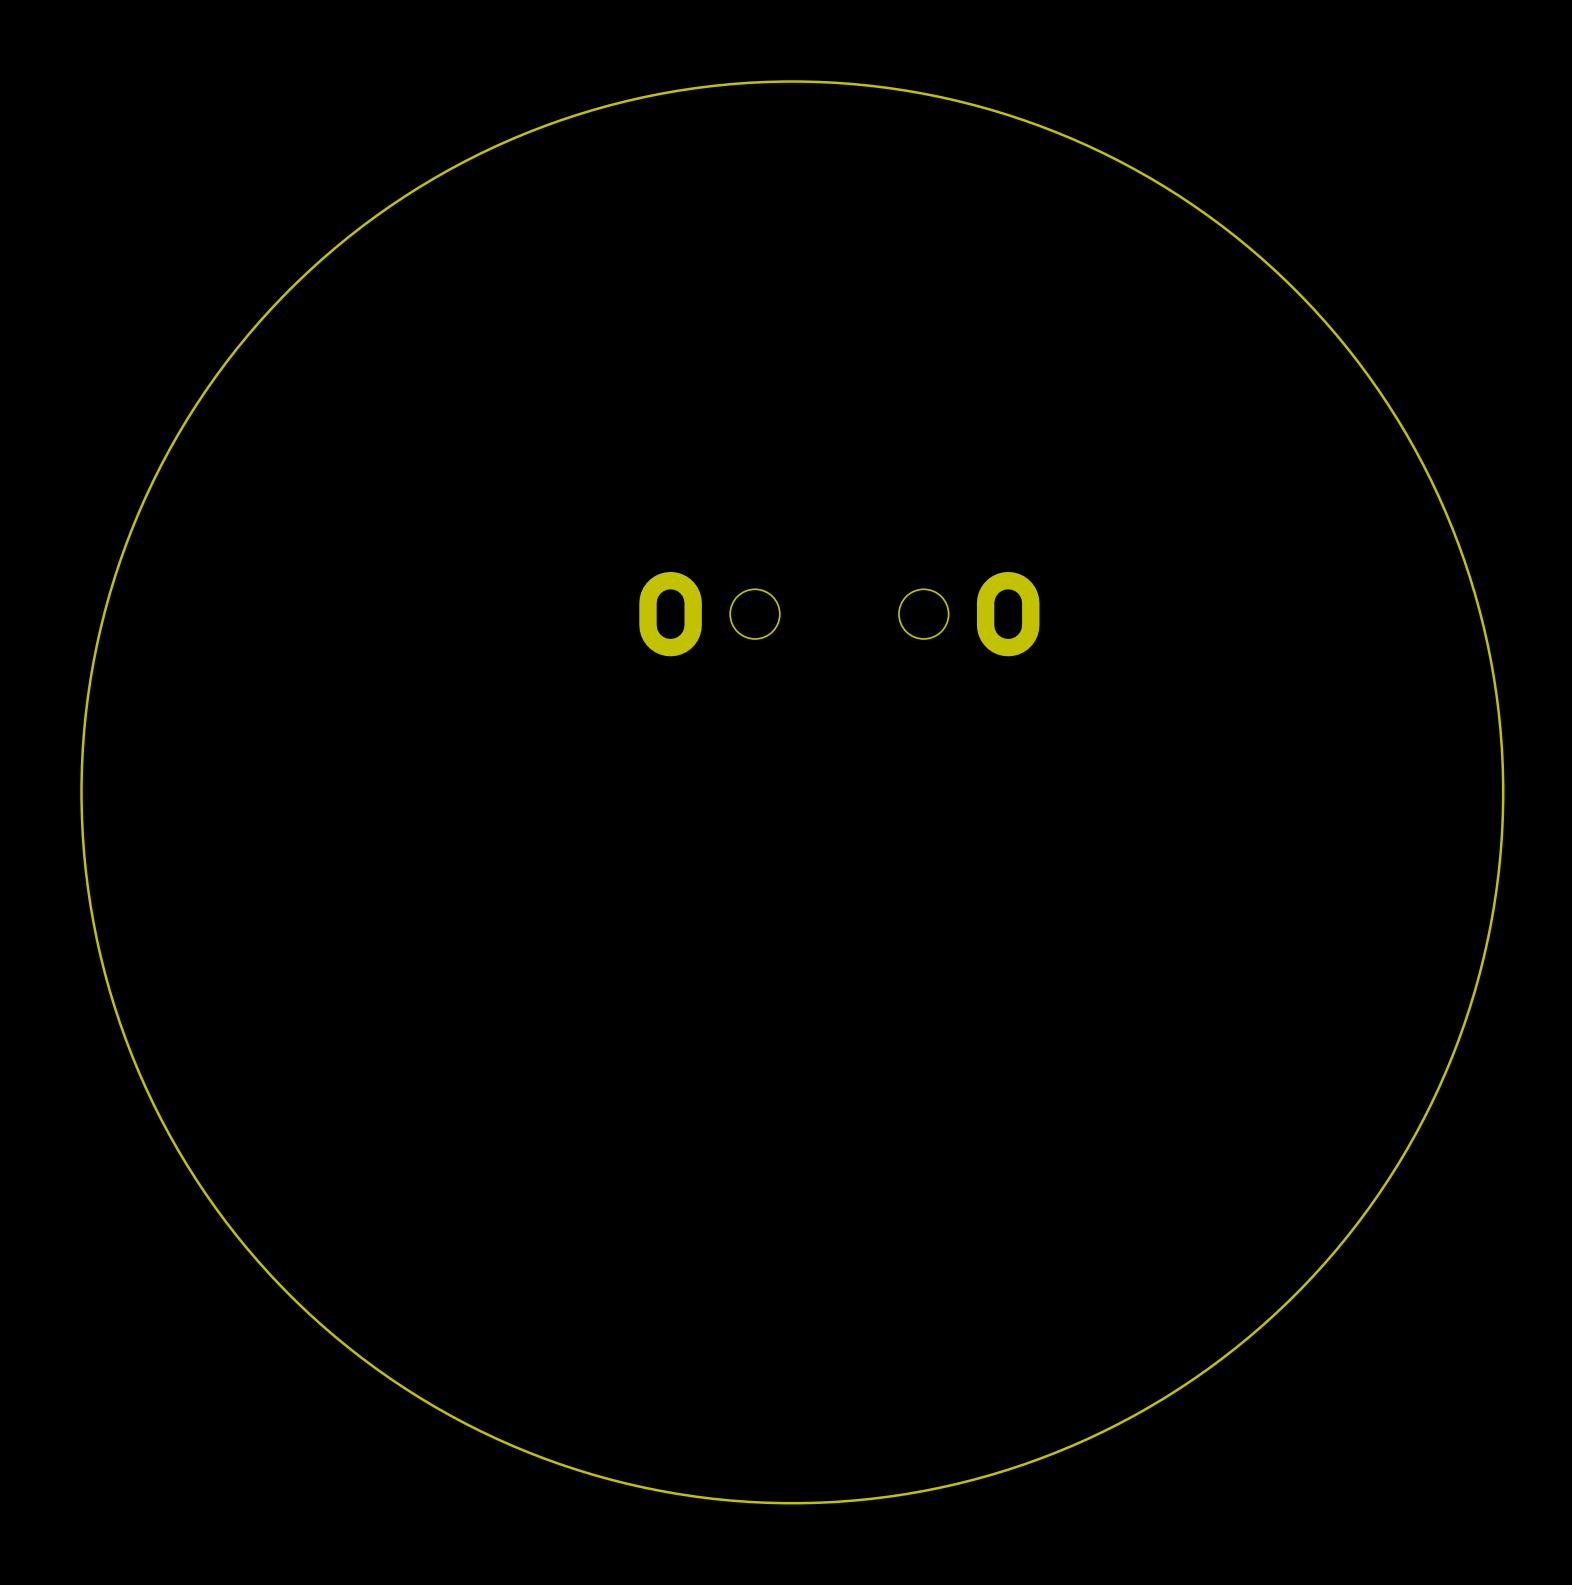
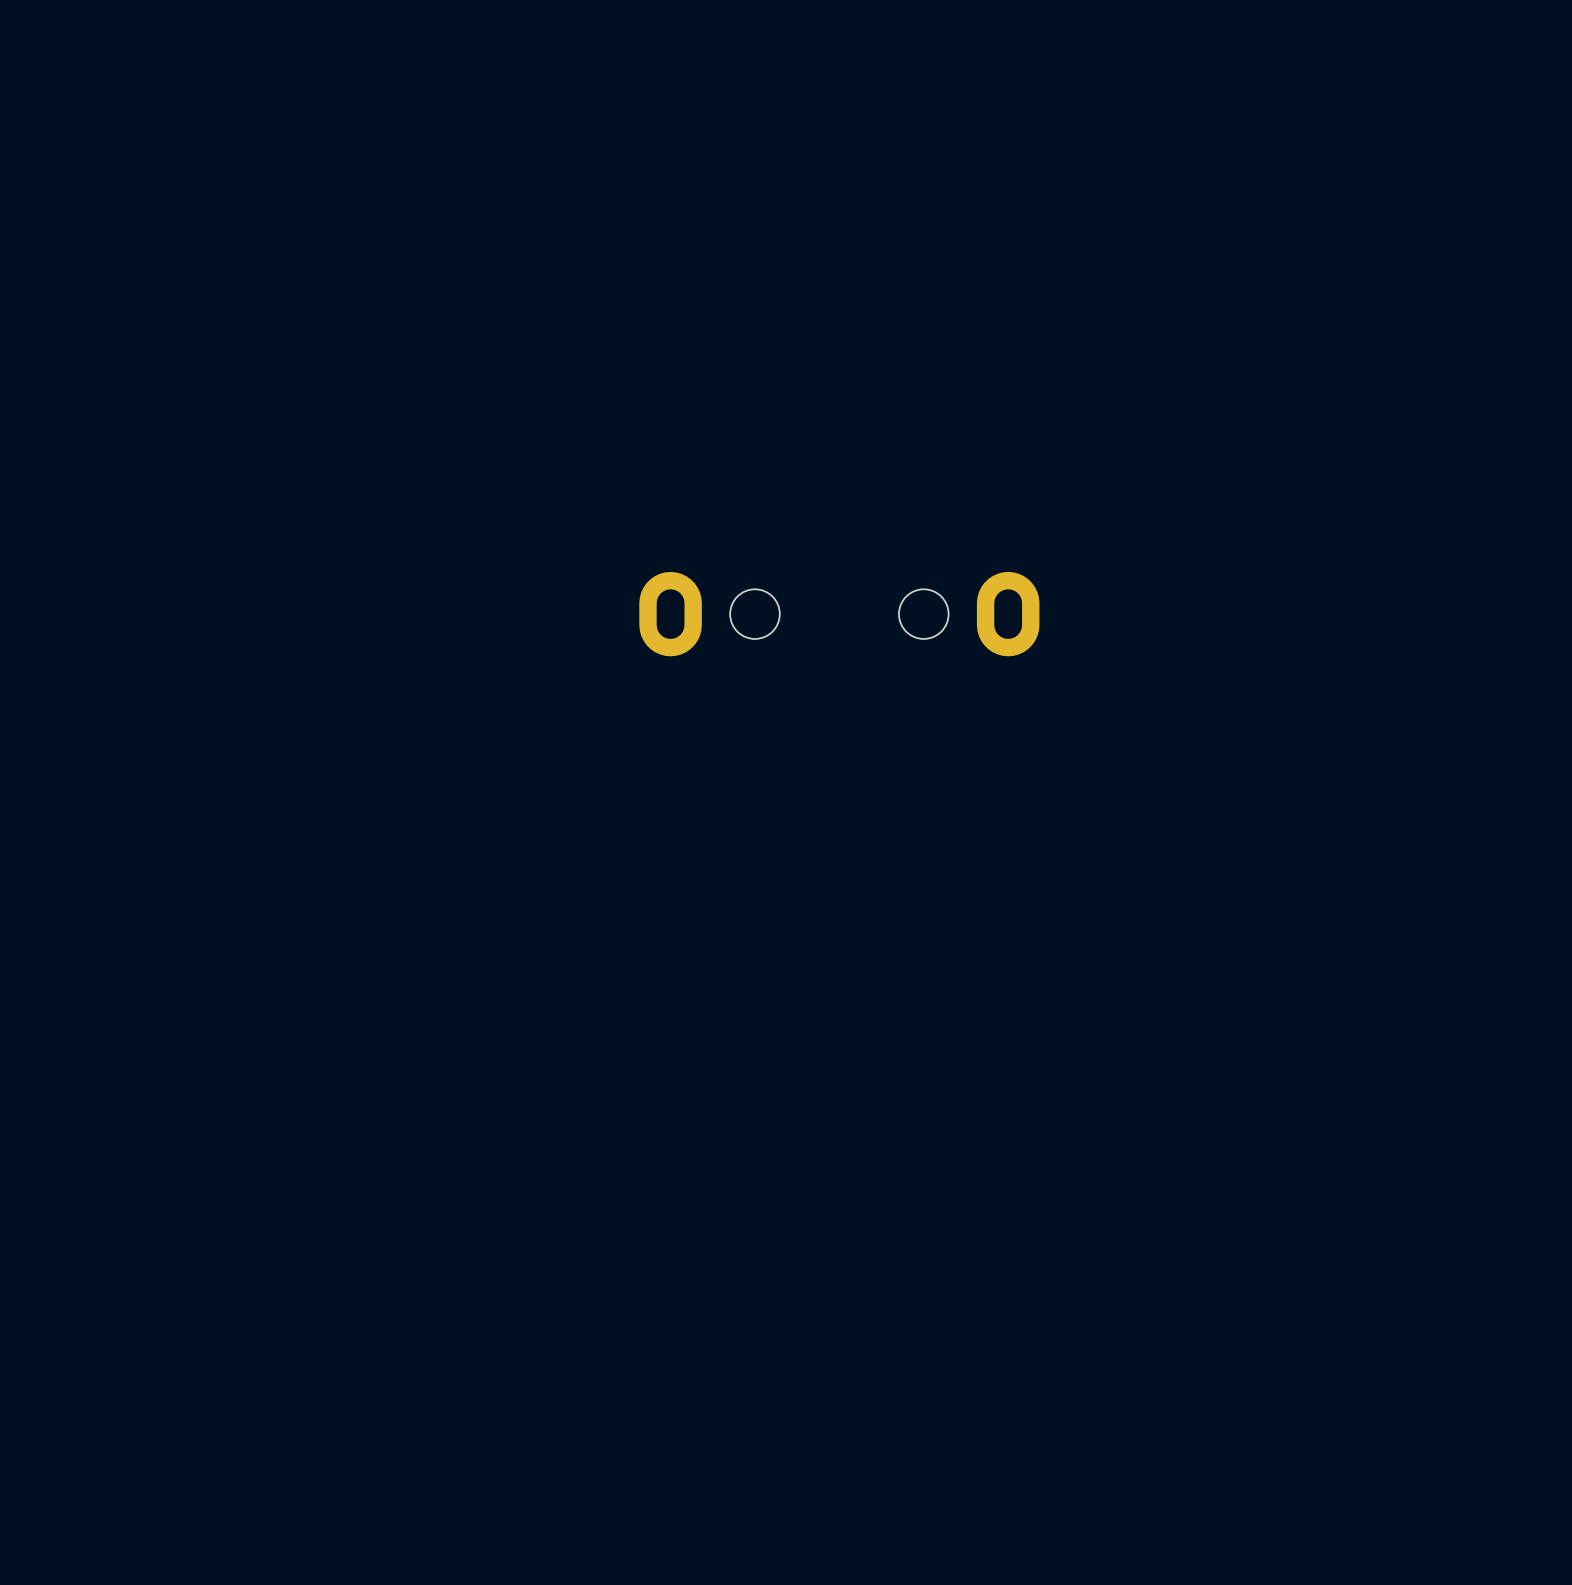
round board edge: [80, 80, 1505, 1505] -> none

